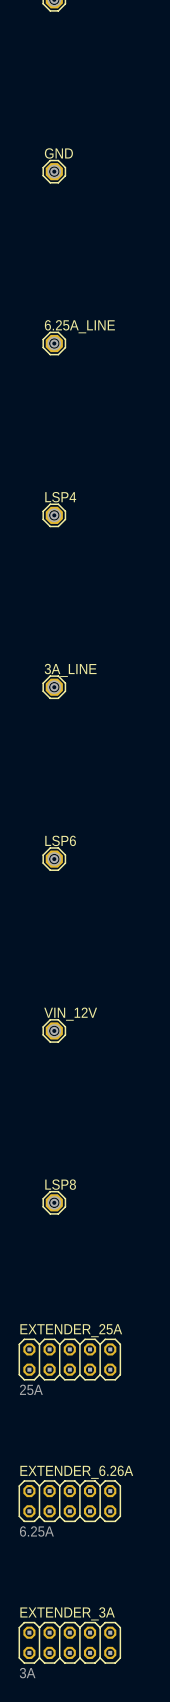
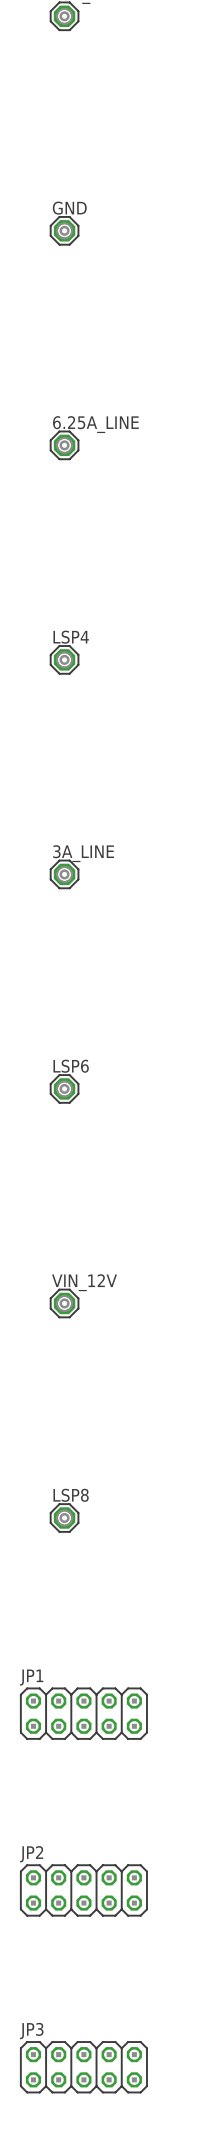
EXTENDER_25A name: EXTENDER_25A (71, 1330) -> JP1 (31, 1677)
EXTENDER_25A value: 25A (31, 1389) -> none
EXTENDER_6.26A name: EXTENDER_6.26A (76, 1472) -> JP2 (31, 1854)
EXTENDER_6.26A value: 6.25A (36, 1531) -> none
EXTENDER_3A name: EXTENDER_3A (67, 1613) -> JP3 (31, 2031)
EXTENDER_3A value: 3A (27, 1673) -> none

